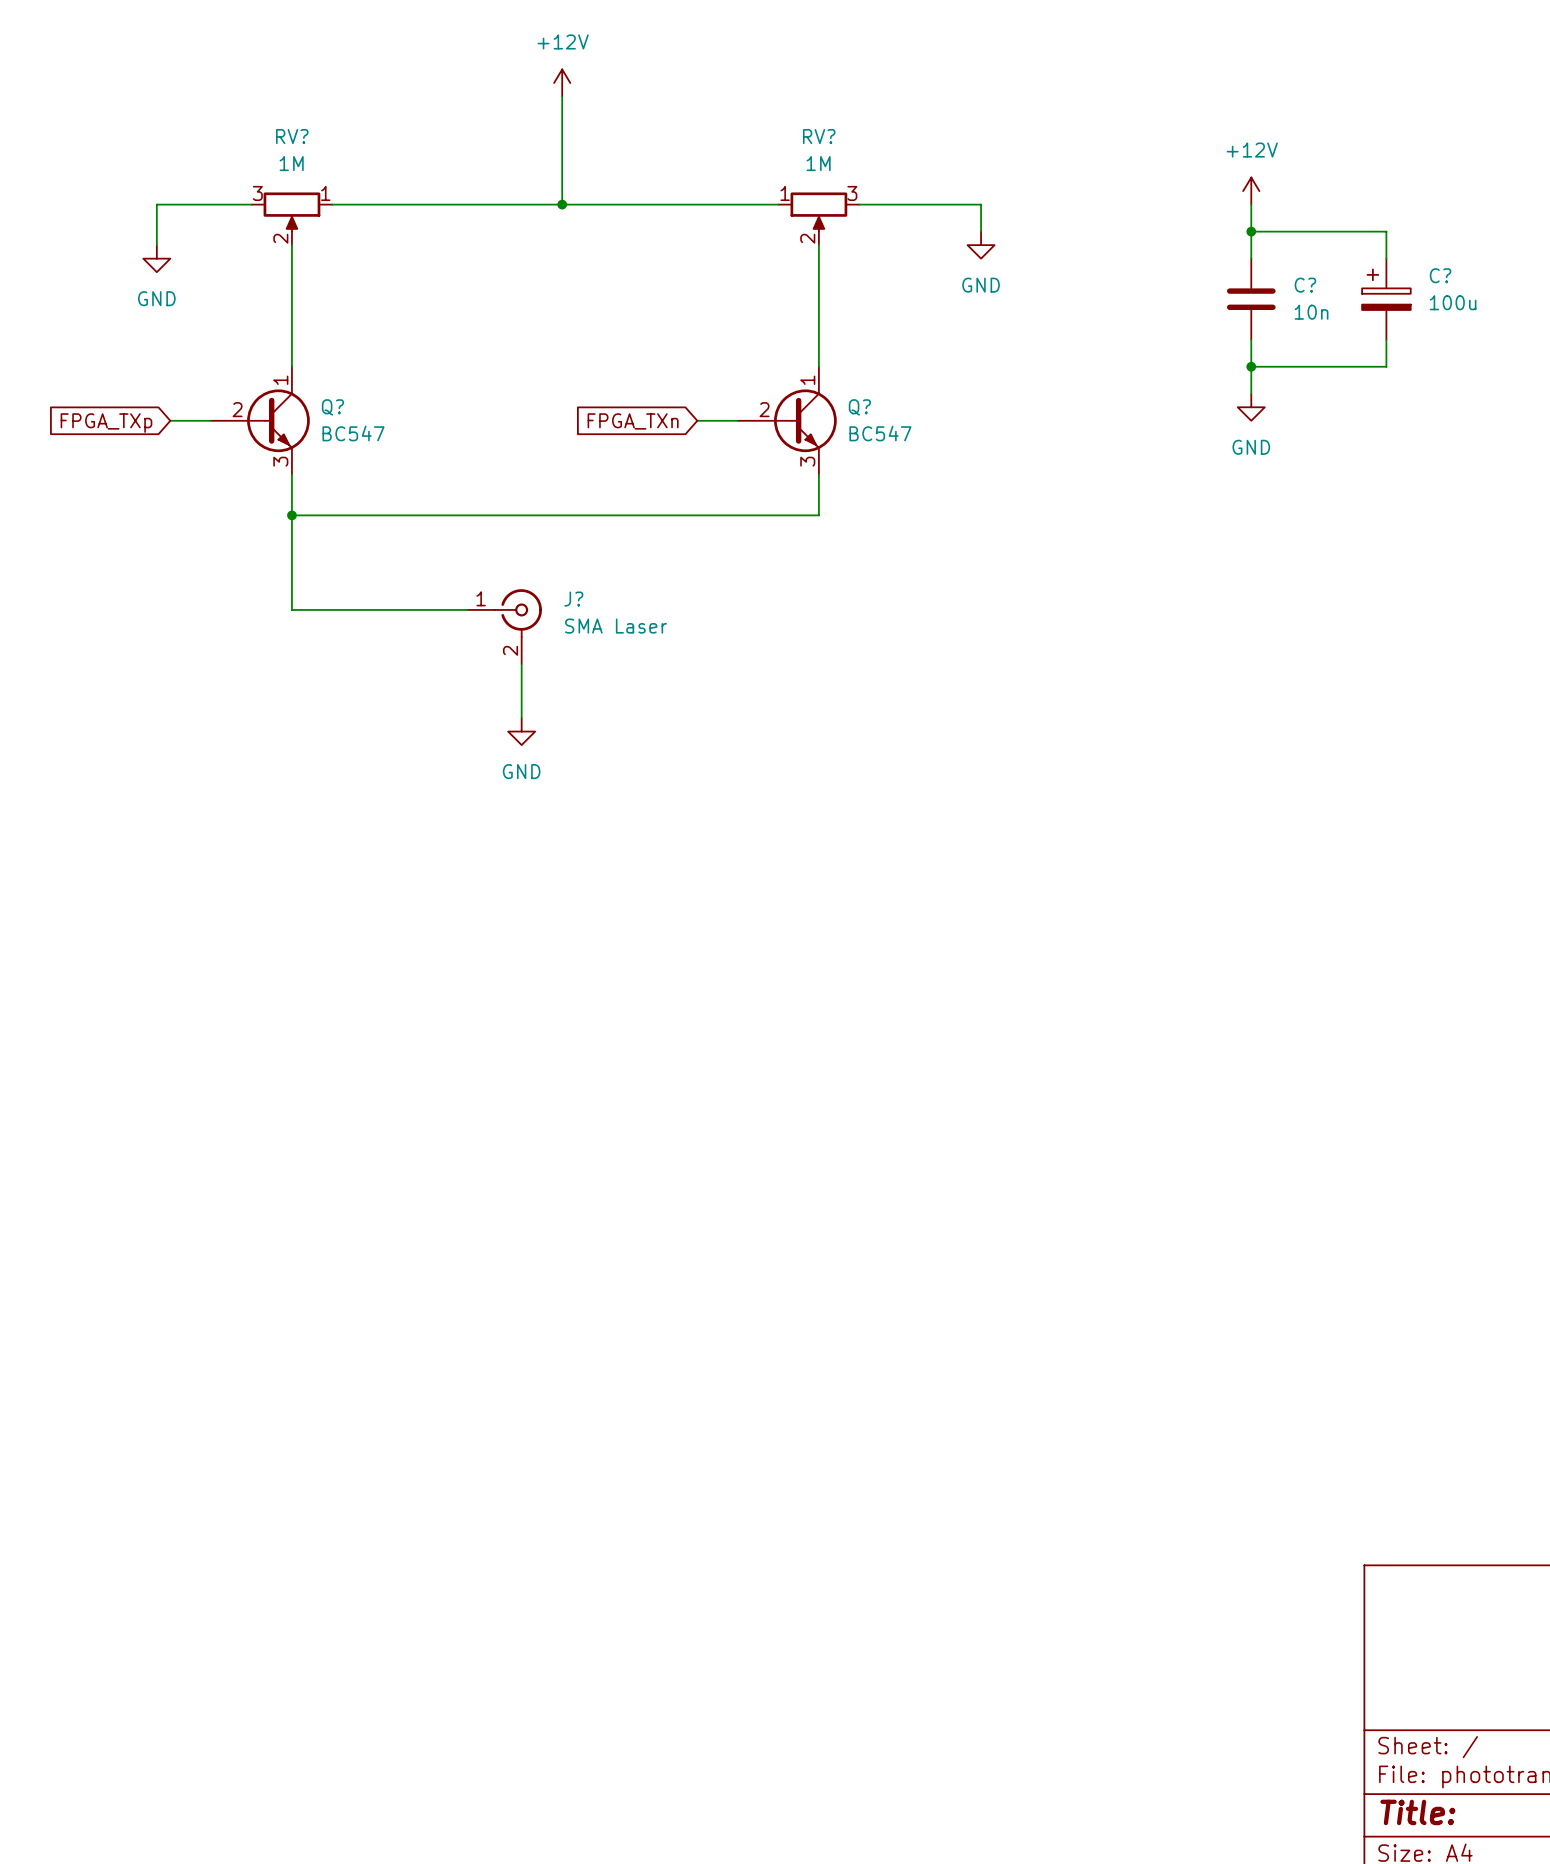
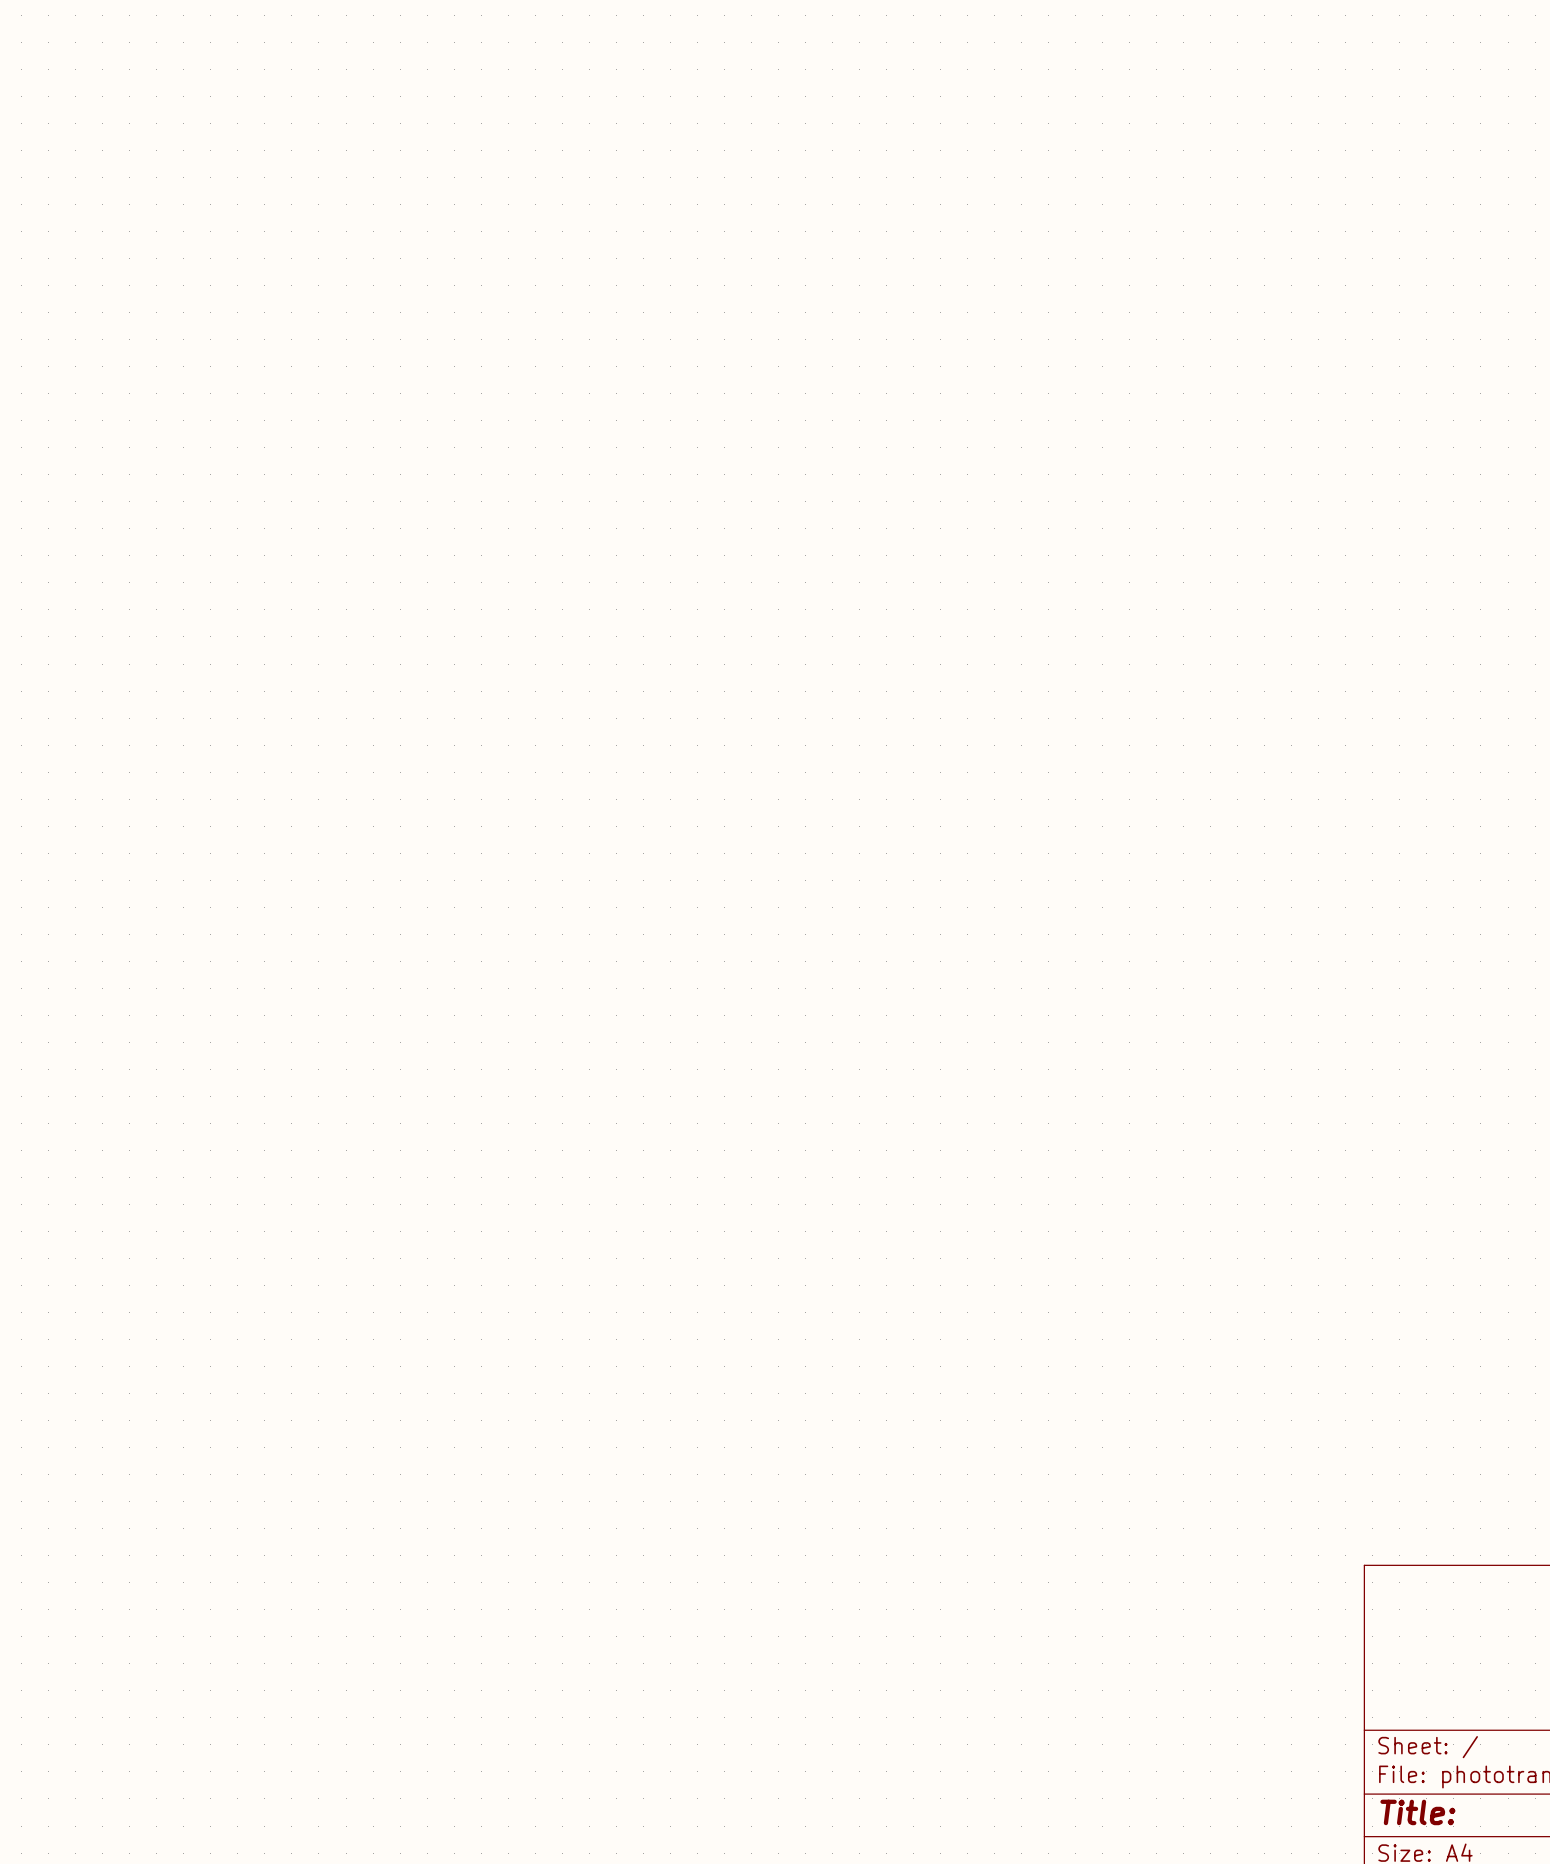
power symbol: +12V (562, 83) -> none
wire: (562, 96) (562, 204) -> none
power symbol: +12V (1251, 191) -> none
wire: (251, 204) (156, 204) (156, 245) -> none
wire: (332, 204) (778, 204) -> none
junction: (562, 204) -> none
wire: (859, 204) (981, 204) (981, 231) -> none
wire: (1251, 204) (1251, 258) -> none
RV?: 1M (291, 218) -> none
RV?: 1M (818, 218) -> none
wire: (1251, 231) (1386, 231) (1386, 258) -> none
junction: (1251, 231) -> none
wire: (291, 245) (291, 366) -> none
wire: (818, 245) (818, 366) -> none
power symbol: GND (981, 245) -> none
power symbol: GND (156, 258) -> none
C?: 10n (1251, 299) -> none
C?: 100u (1386, 299) -> none
wire: (1251, 339) (1251, 393) -> none
wire: (1386, 339) (1386, 366) (1251, 366) -> none
junction: (1251, 366) -> none
power symbol: GND (1251, 407) -> none
wire: (170, 420) (210, 420) -> none
Q?: BC547 (260, 420) -> none
wire: (697, 420) (737, 420) -> none
Q?: BC547 (787, 420) -> none
global label: FPGA_TXn (633, 421) -> none
global label: FPGA_TXp (106, 423) -> none
wire: (291, 474) (291, 609) (467, 609) -> none
wire: (818, 474) (818, 515) (291, 515) -> none
junction: (291, 515) -> none
J?: SMA Laser (504, 626) -> none
wire: (521, 664) (521, 718) -> none
power symbol: GND (521, 731) -> none

